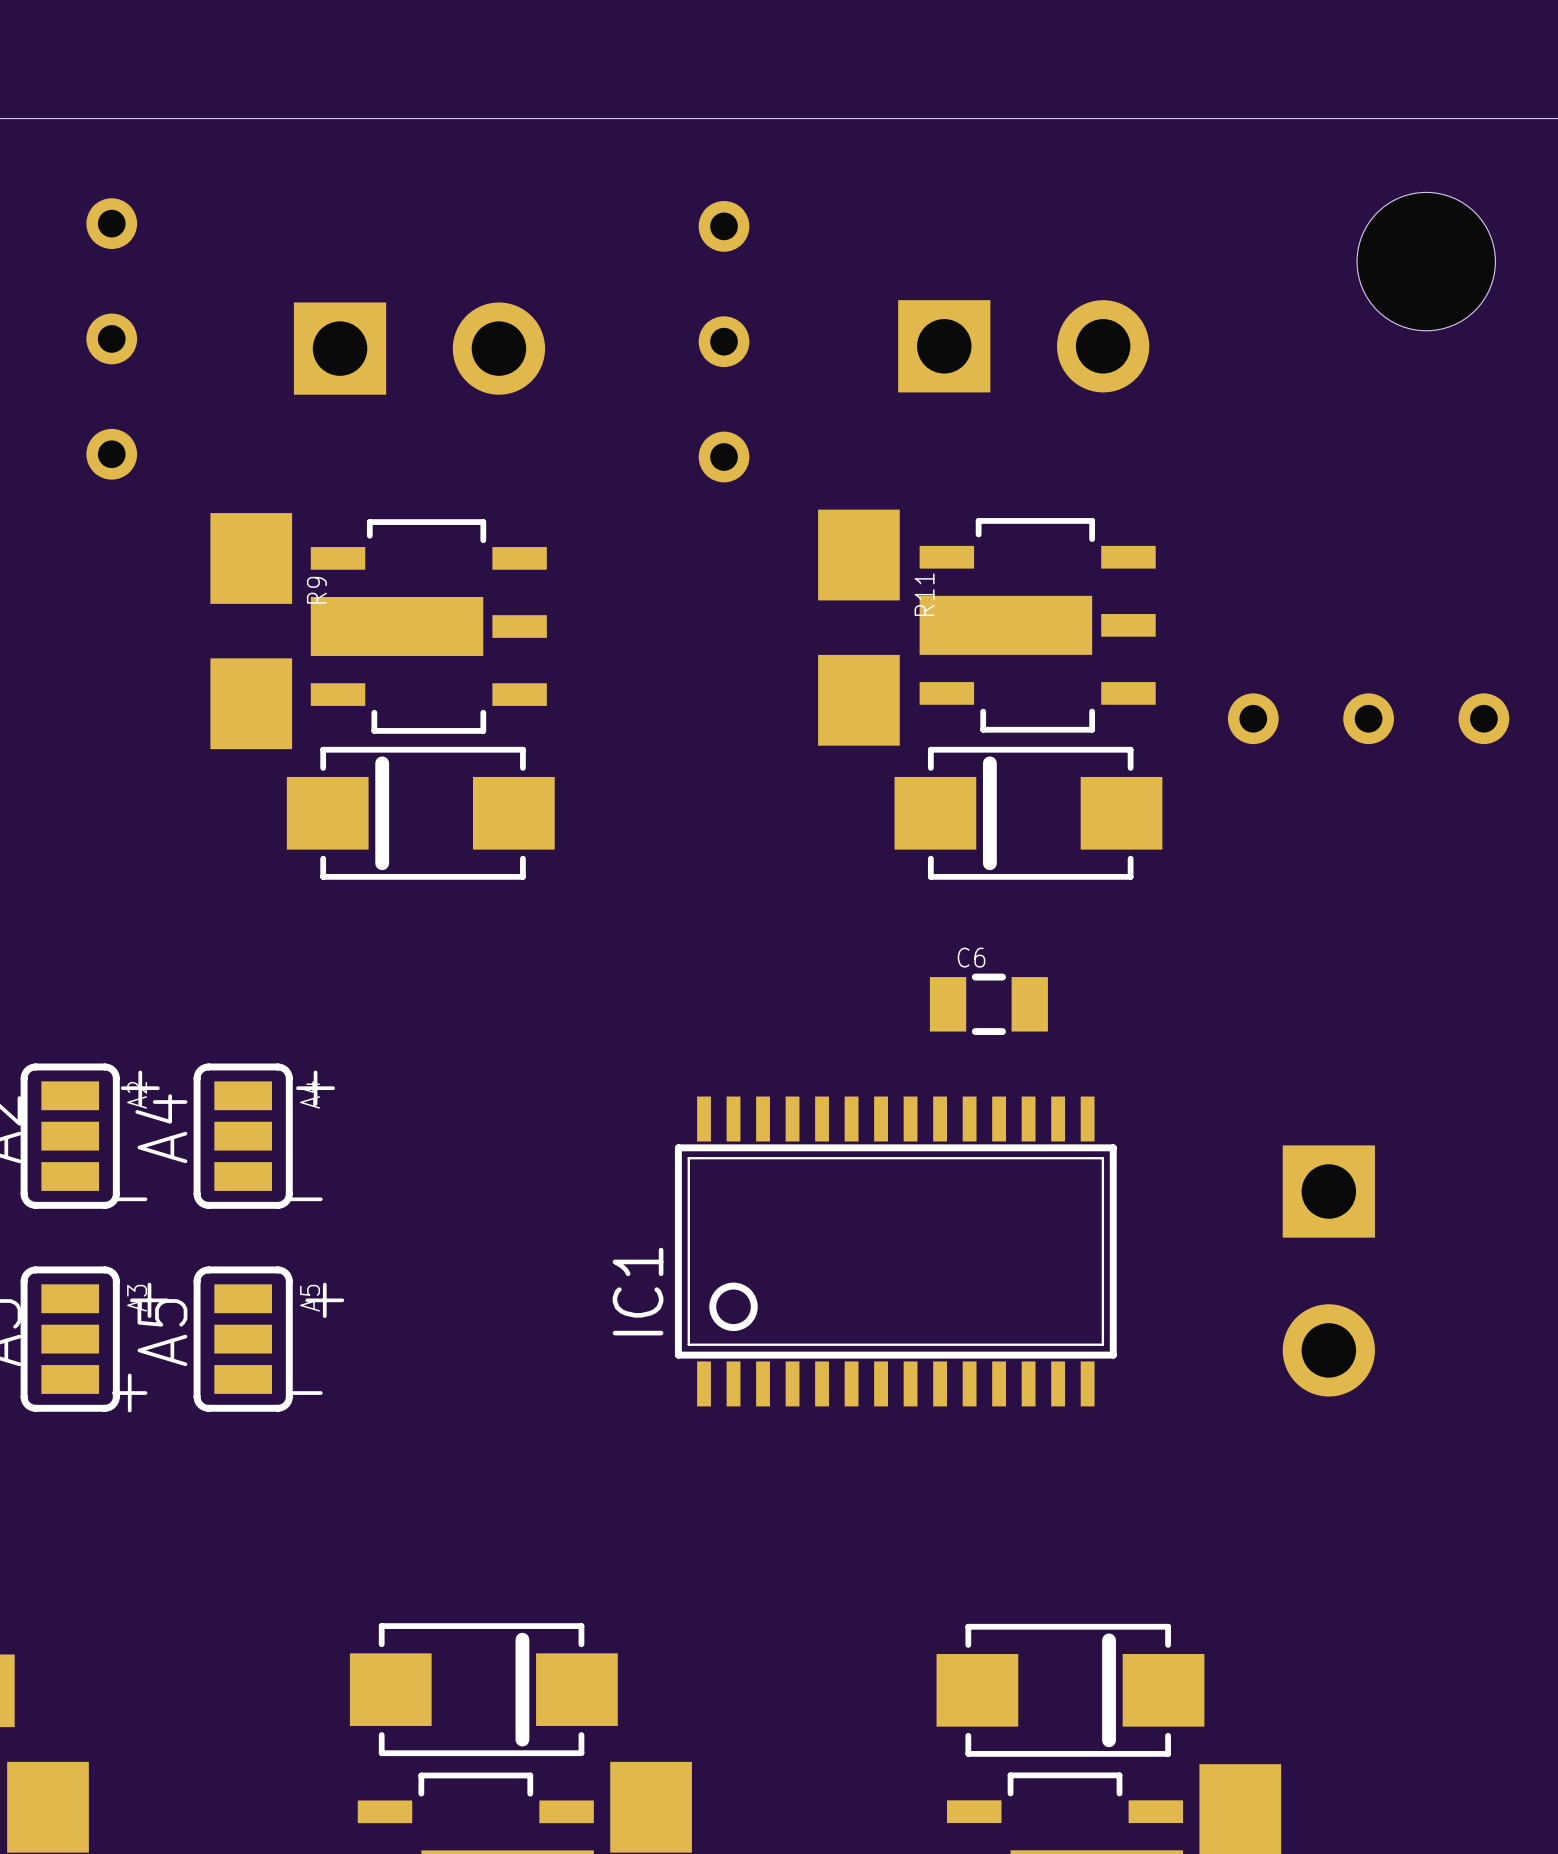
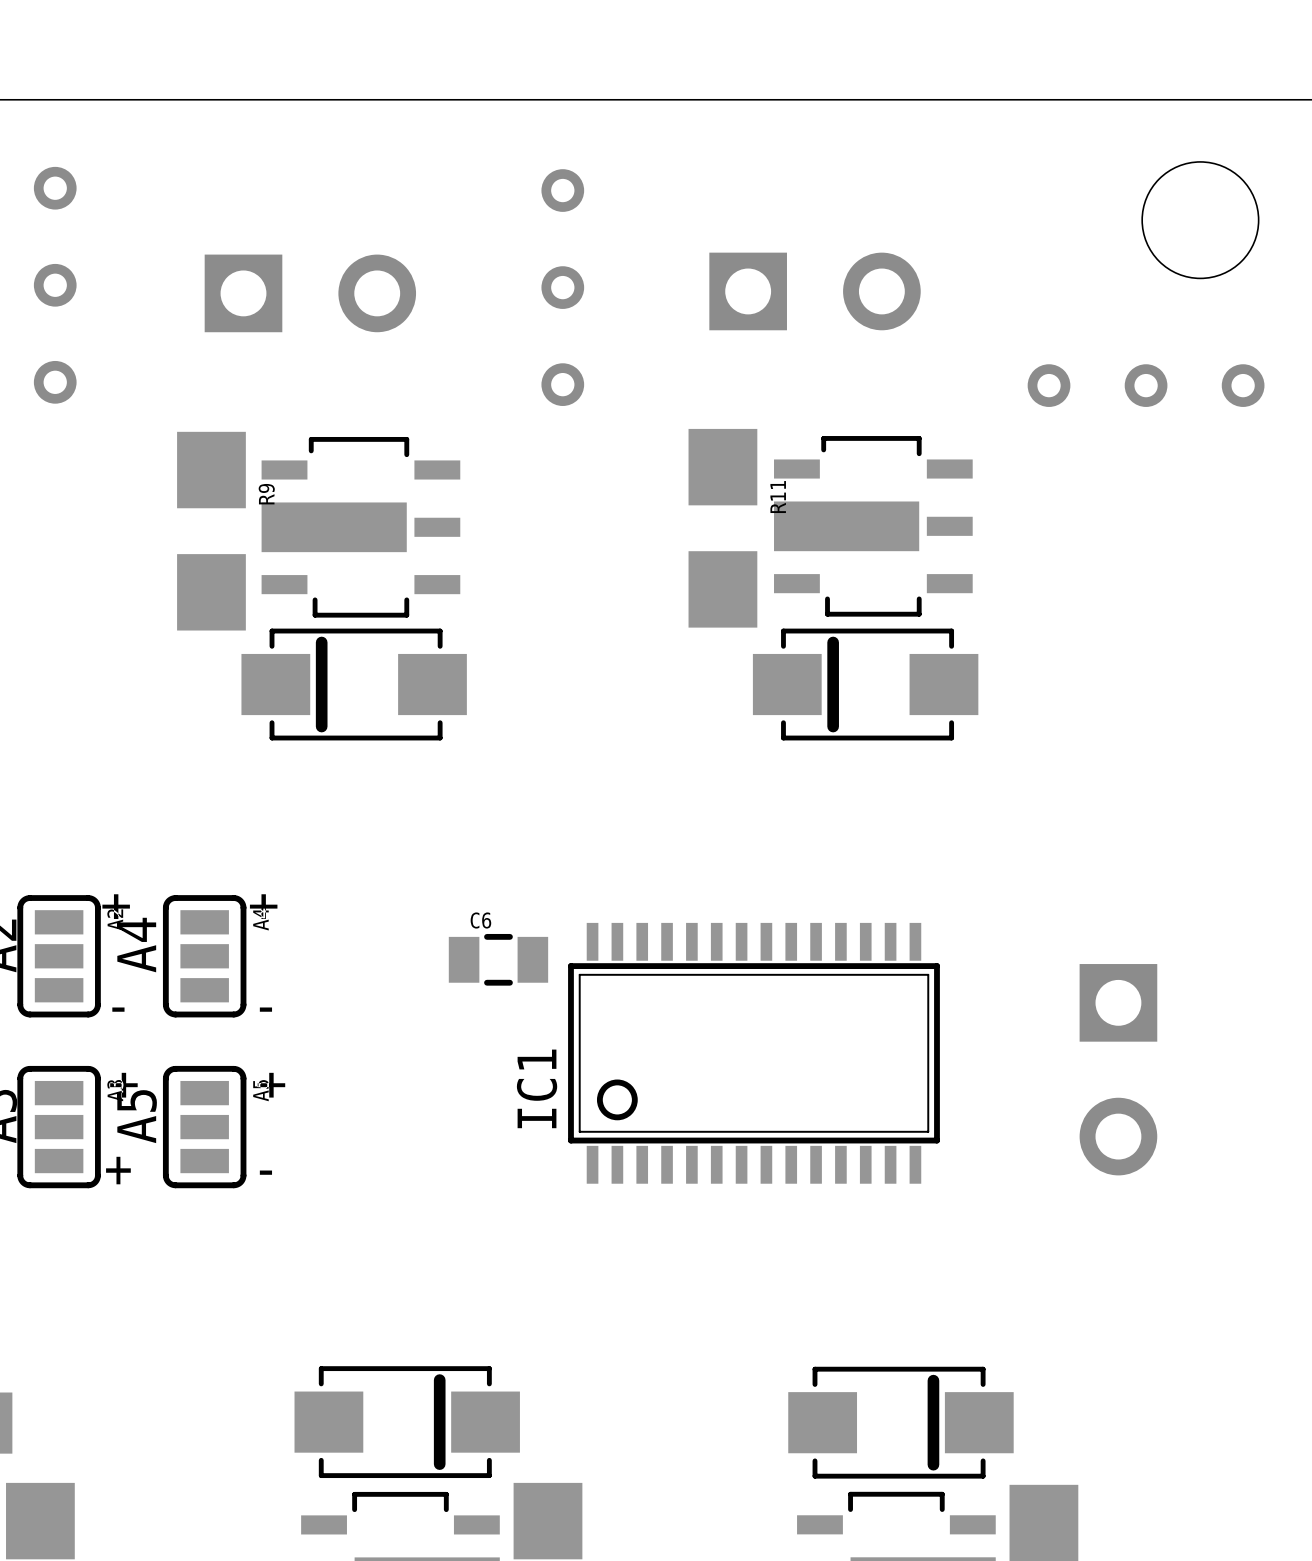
part position: (111, 338) -> (55, 285)
part position: (724, 341) -> (562, 287)
part position: (1023, 346) -> (815, 291)
part position: (419, 348) -> (310, 293)
part position: (1368, 718) -> (1146, 385)
C6 position: (988, 1004) -> (498, 959)

